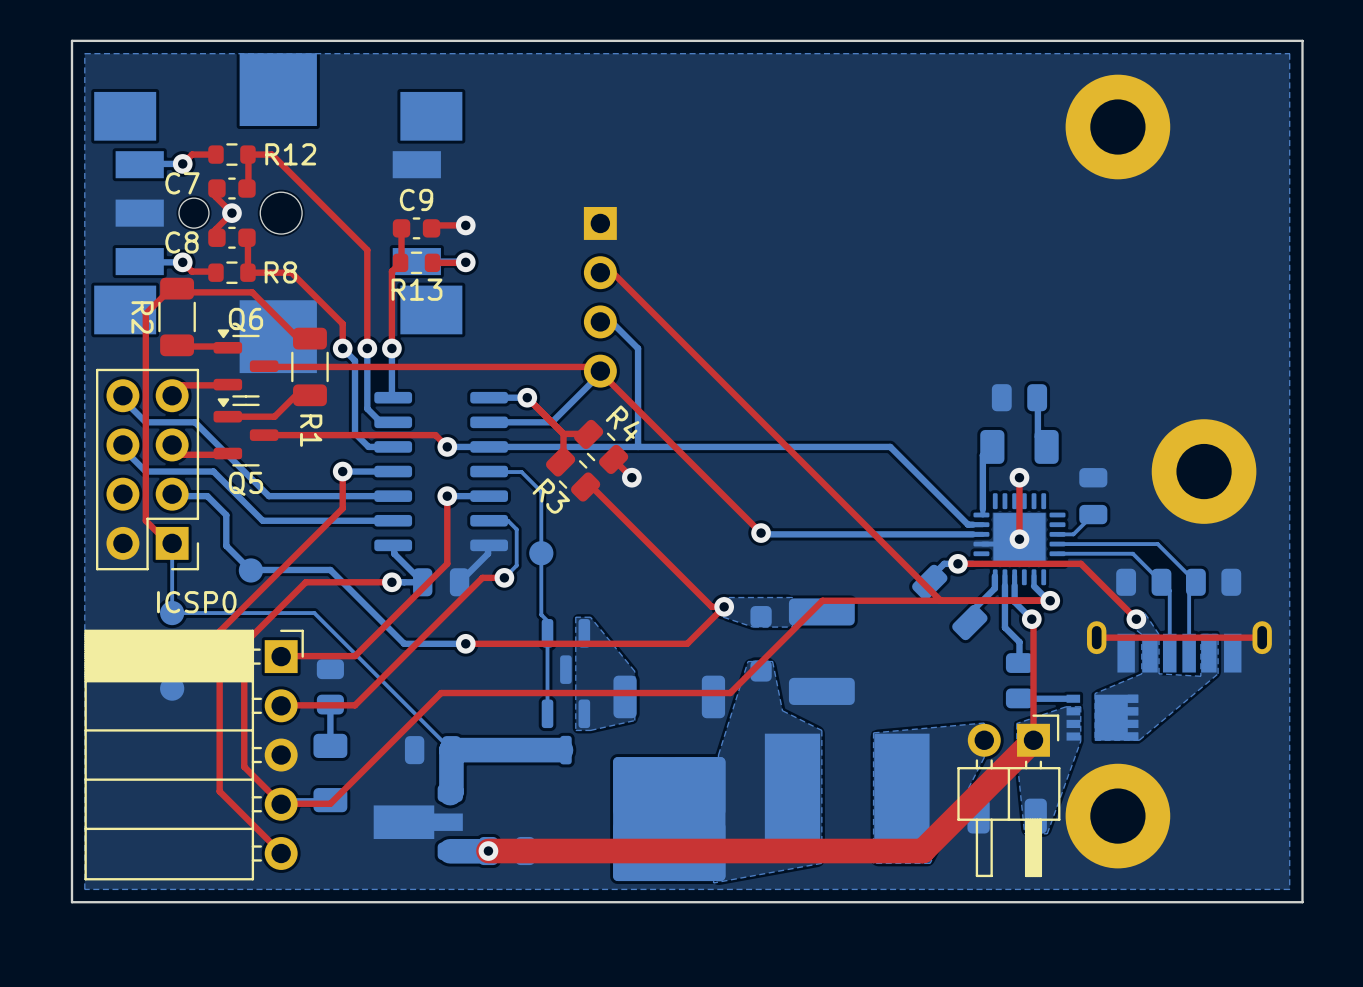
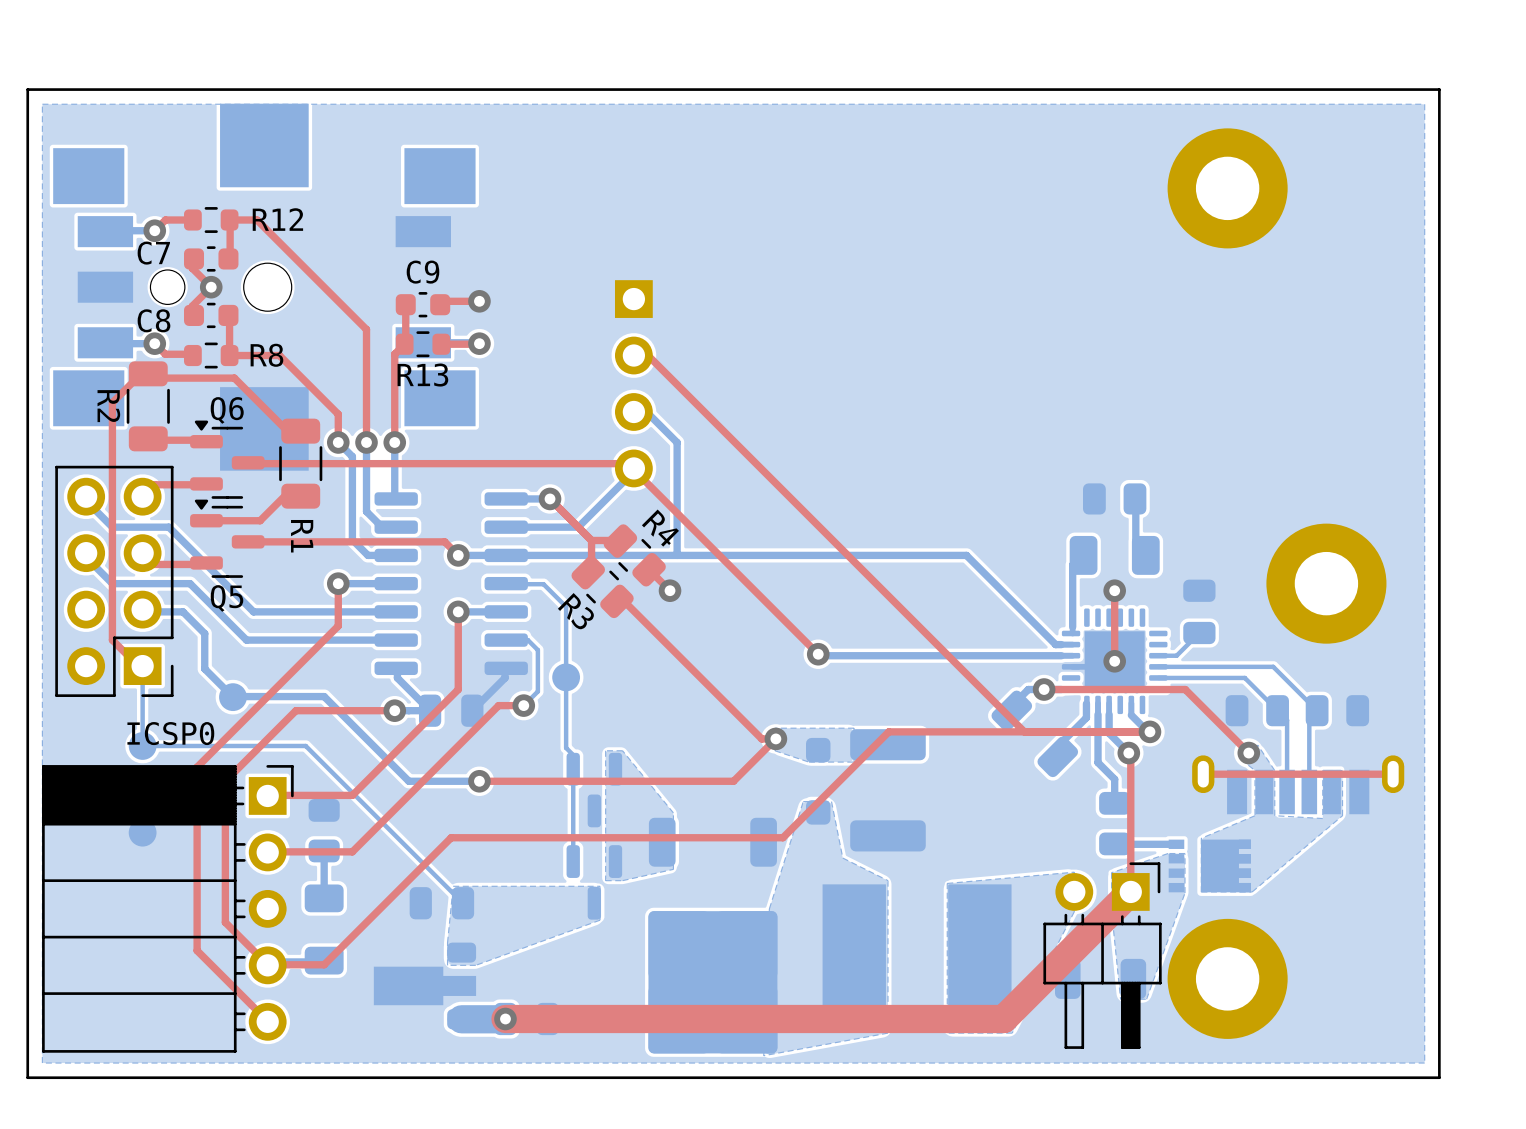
bottom zone outline: none -> (453, 886) (600, 886) (600, 920) (475, 965) (447, 965) (447, 942) (453, 886)
bottom track: (565, 750) (451, 750) (450, 793) -> none

